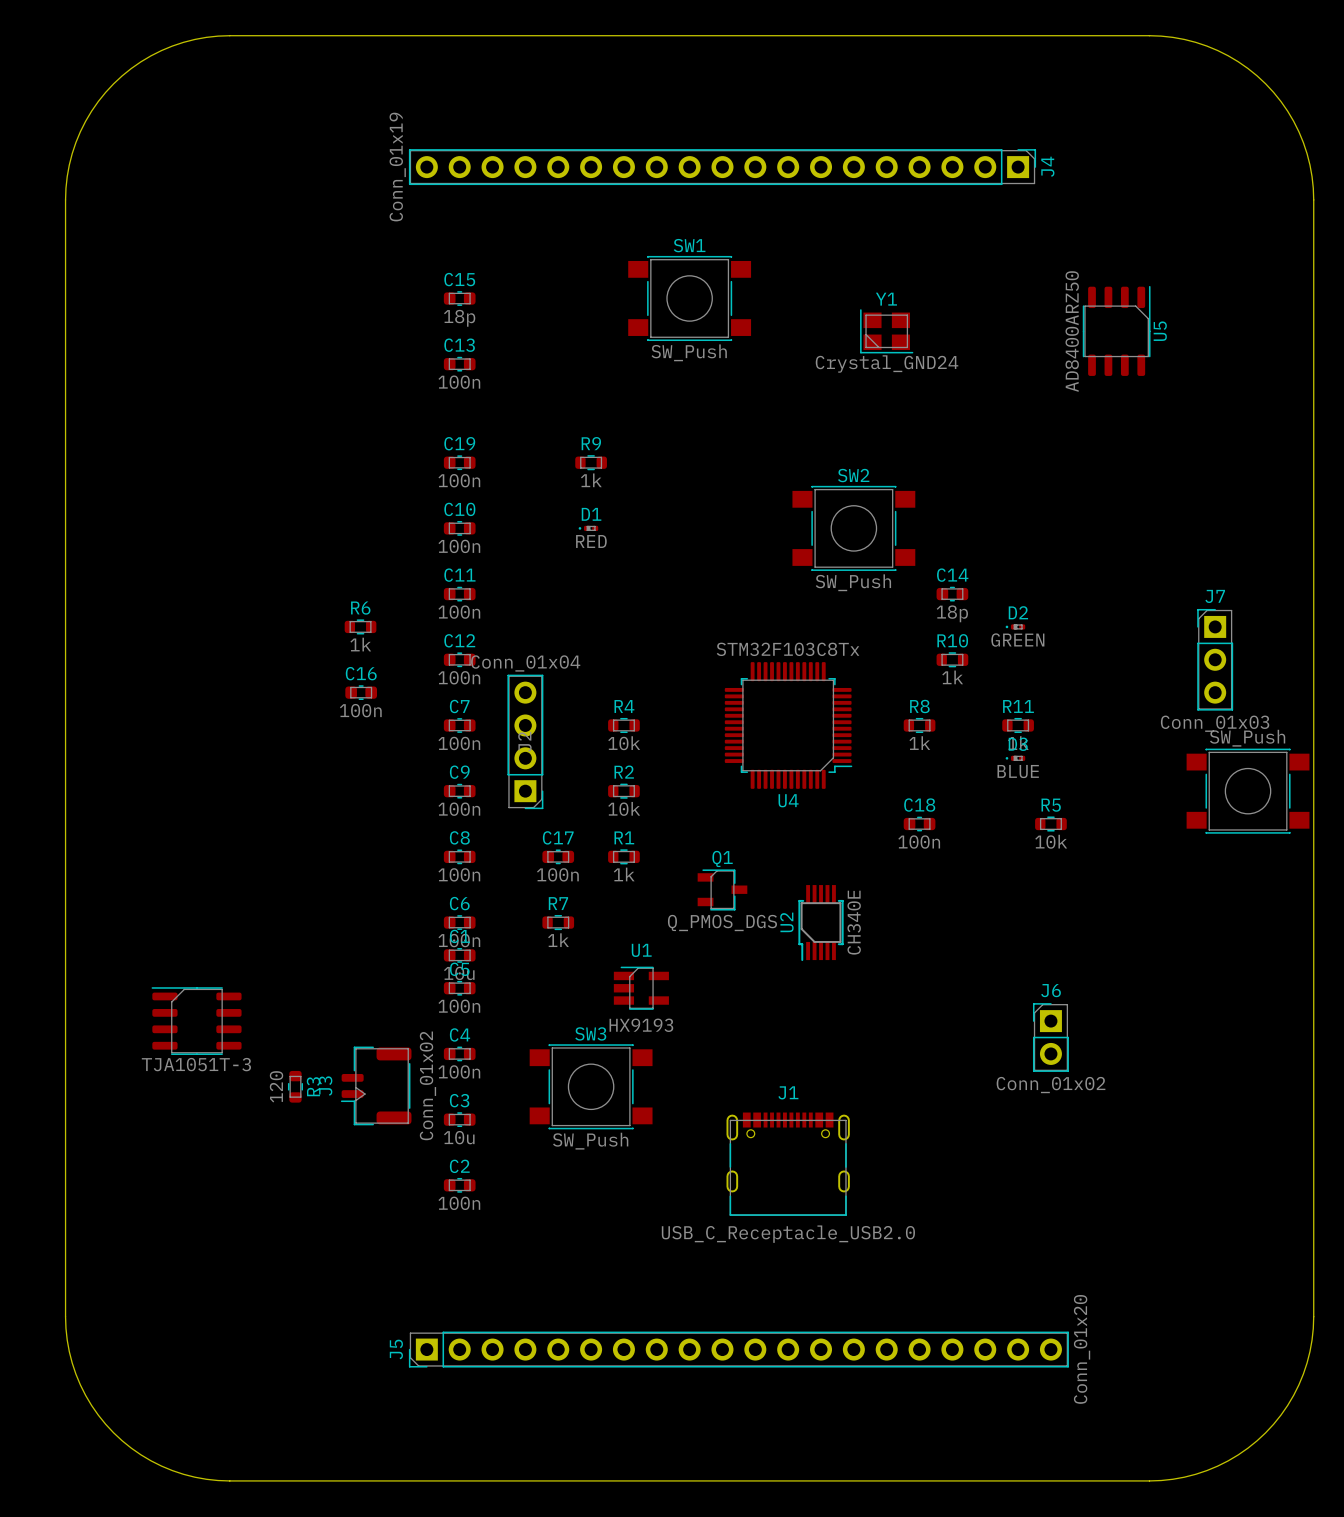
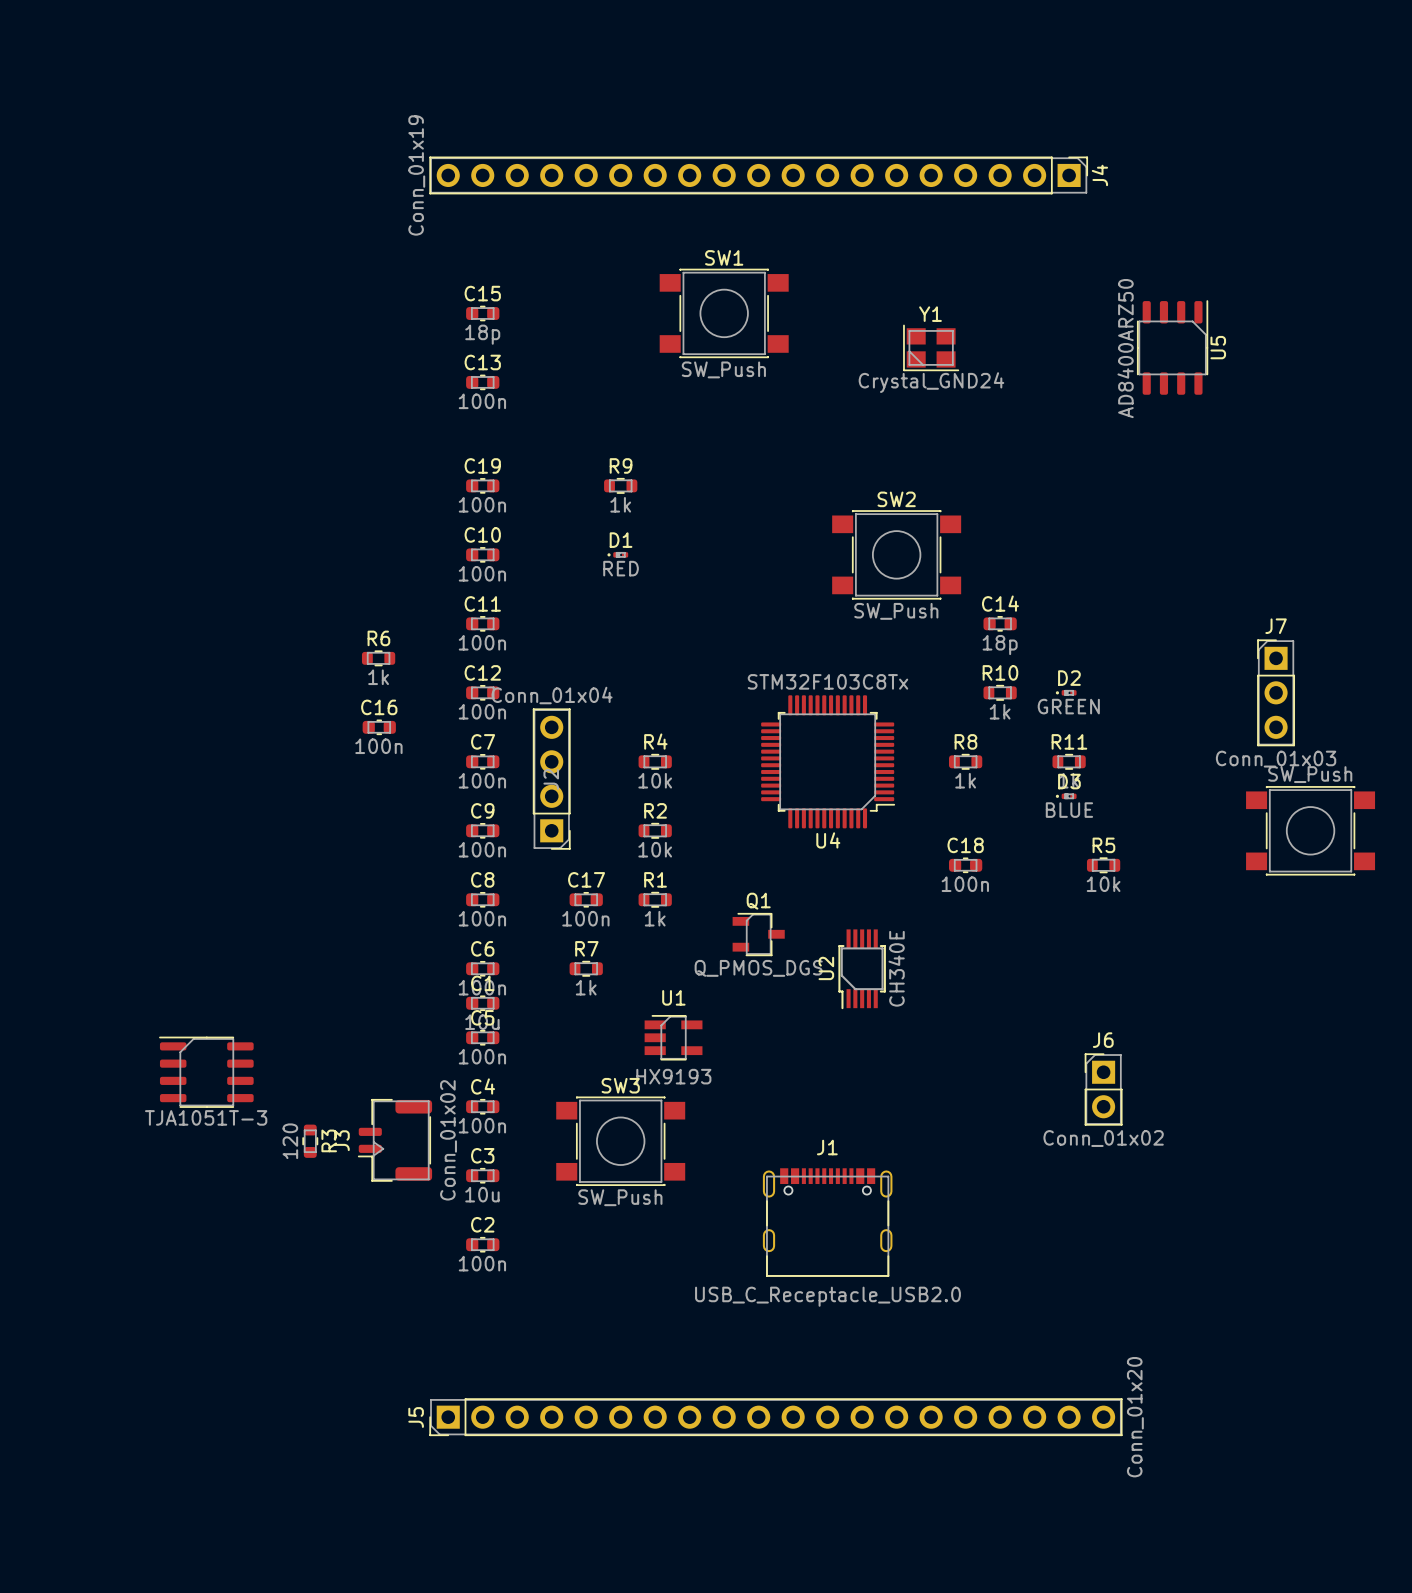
board edge: (229, 35) (1161, 36) (1195, 42) (1228, 55) (1257, 75) (1280, 101) (1293, 121) (1307, 153) (1312, 176) (1313, 199) (1313, 1316) (1309, 1351) (1298, 1384) (1287, 1405) (1273, 1424) (1247, 1448) (1217, 1466) (1195, 1474) (1172, 1479) (1149, 1480) (229, 1480) (194, 1477) (172, 1470) (151, 1460) (122, 1440) (98, 1415) (85, 1395) (75, 1374) (69, 1351) (65, 1316) (65, 188) (69, 165) (80, 131) (91, 111) (113, 83) (140, 61) (172, 46) (206, 37) (229, 35) -> none
D2 position: (1015, 626) -> (1066, 692)

